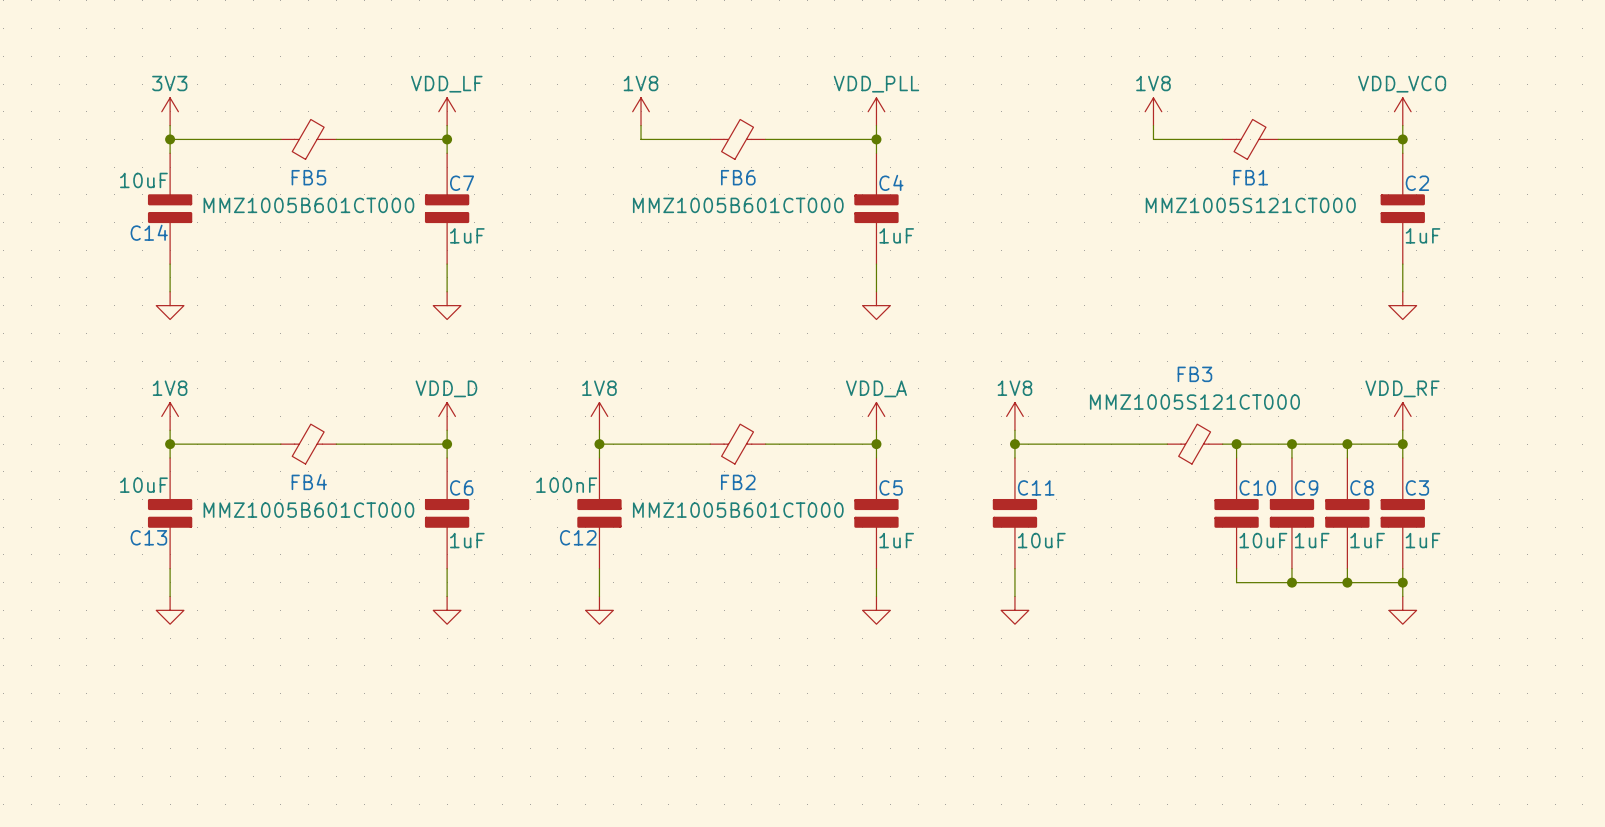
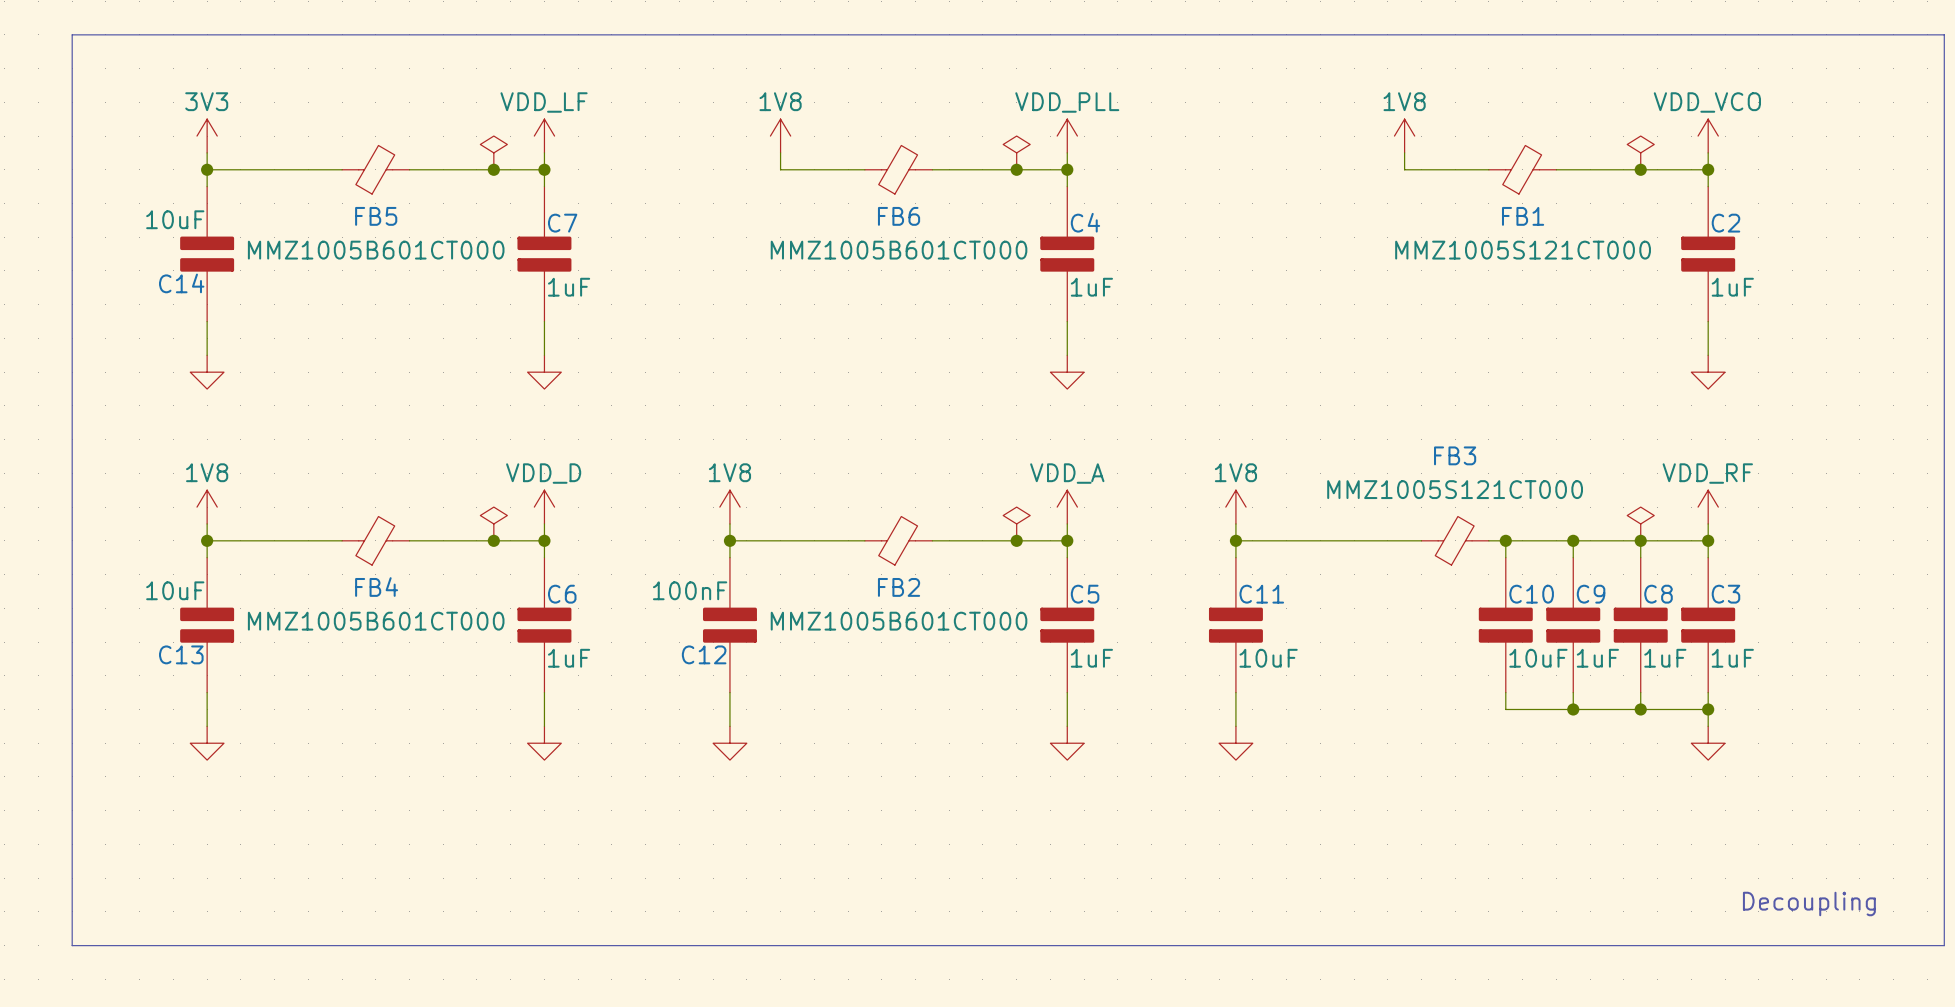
line: none -> (72, 34) (1944, 34) (1944, 945) (72, 945) (72, 34)
power symbol: none -> (493, 152)
power symbol: none -> (1016, 152)
power symbol: none -> (1640, 152)
junction: none -> (493, 169)
junction: none -> (1016, 169)
junction: none -> (1640, 169)
power symbol: none -> (493, 523)
power symbol: none -> (1016, 523)
power symbol: none -> (1640, 523)
junction: none -> (493, 540)
junction: none -> (1016, 540)
text: none -> Decoupling (1809, 903)

